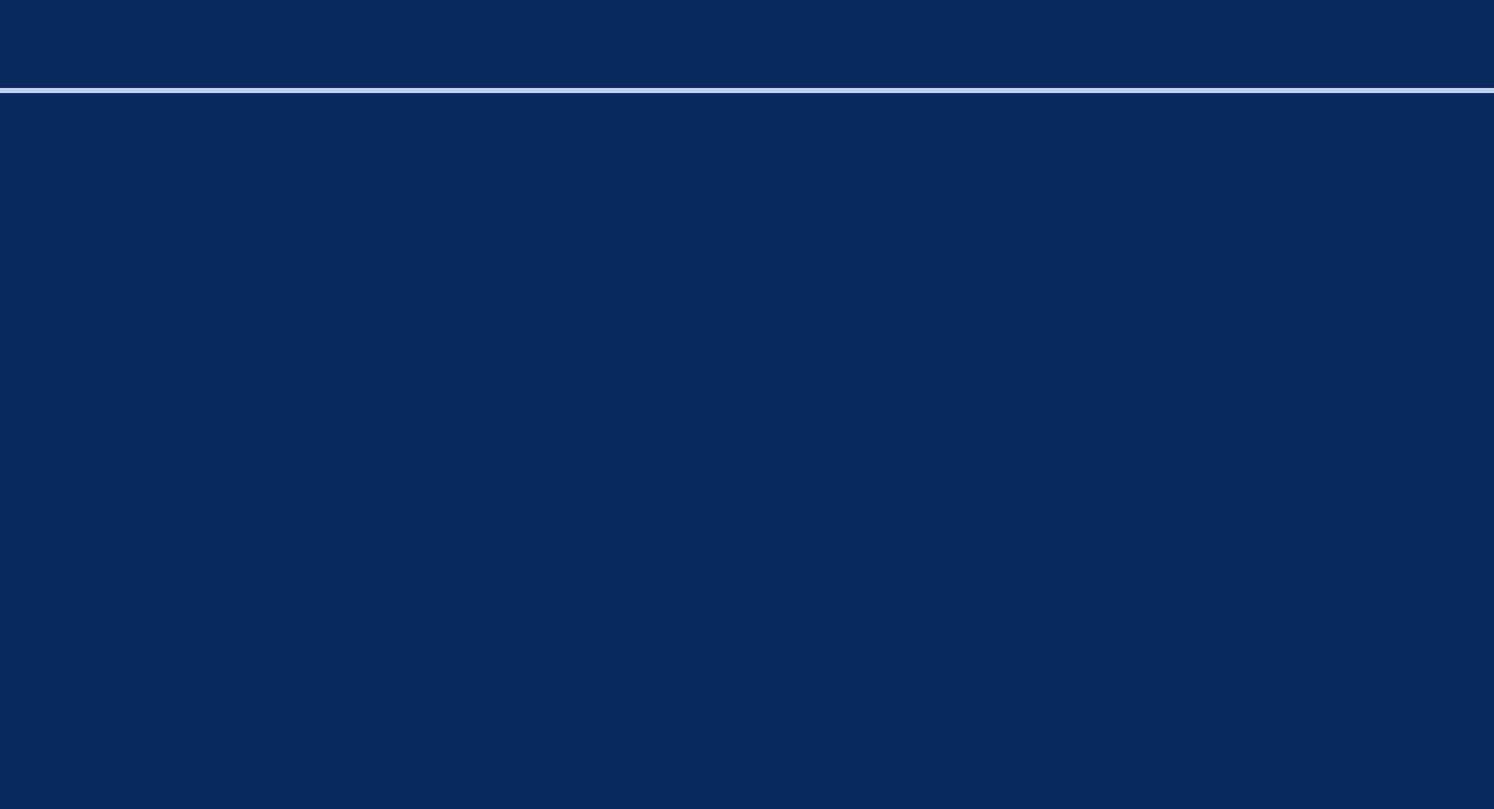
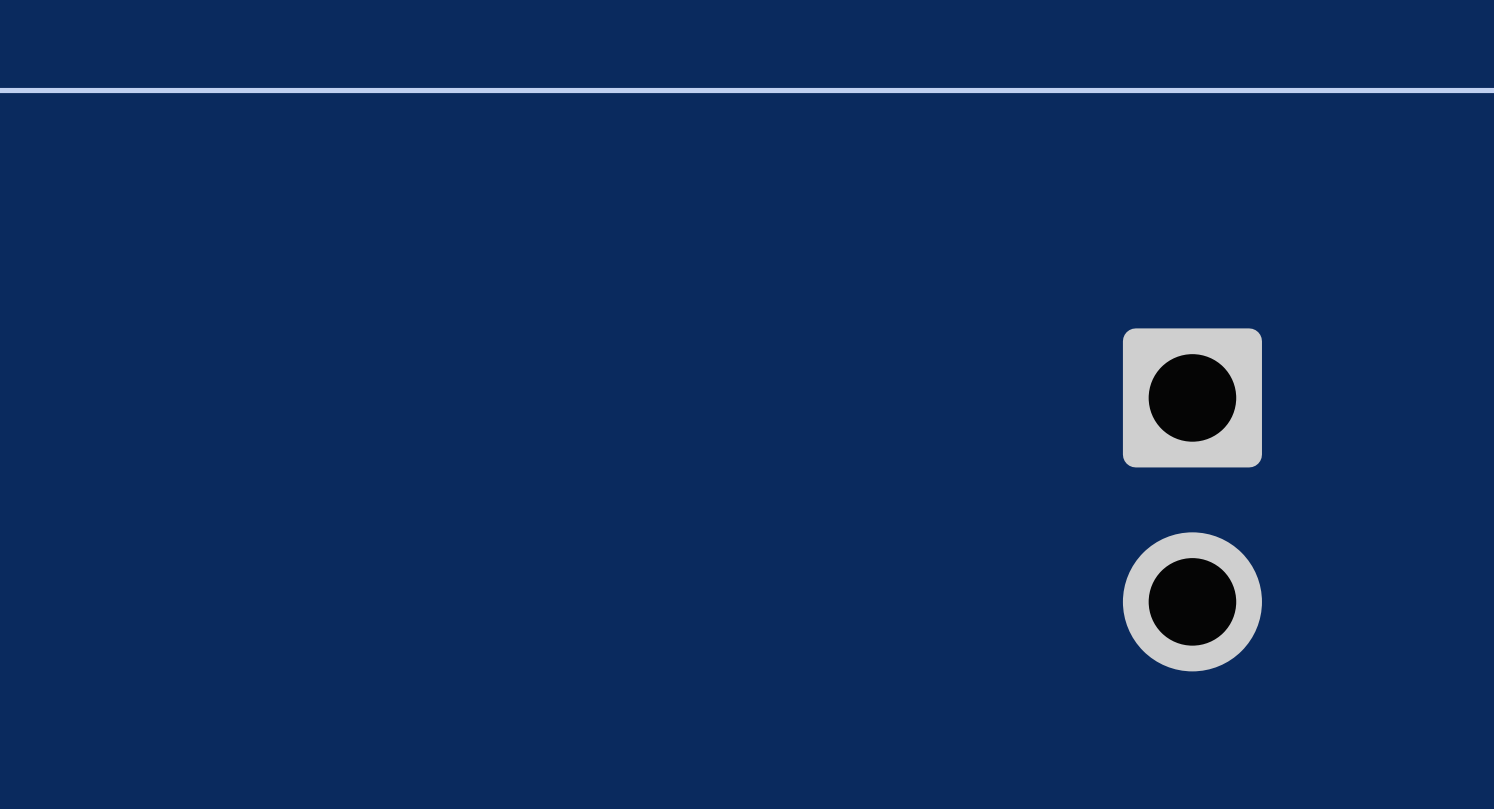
part: none -> (1192, 499)

